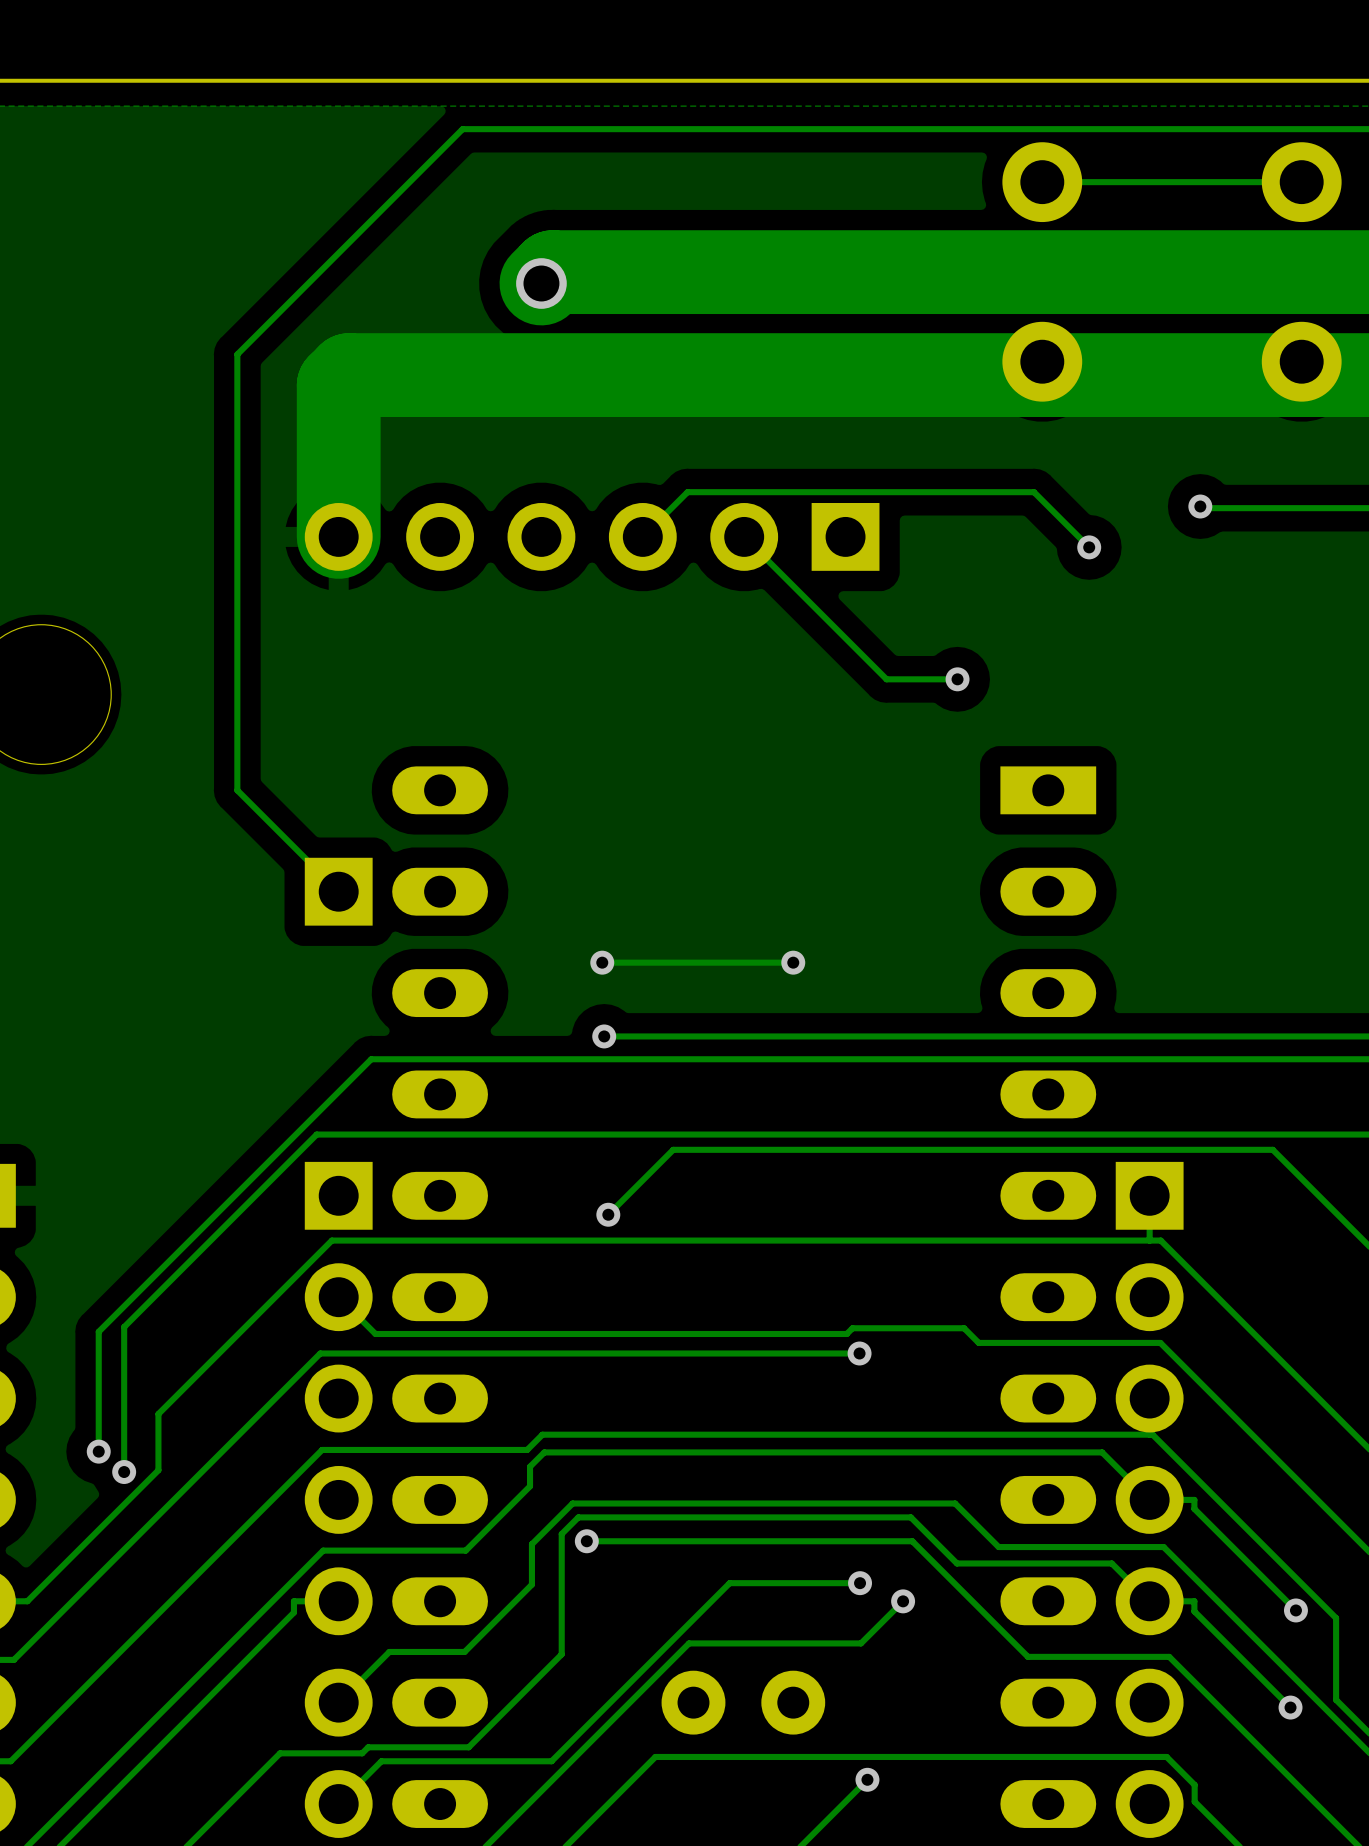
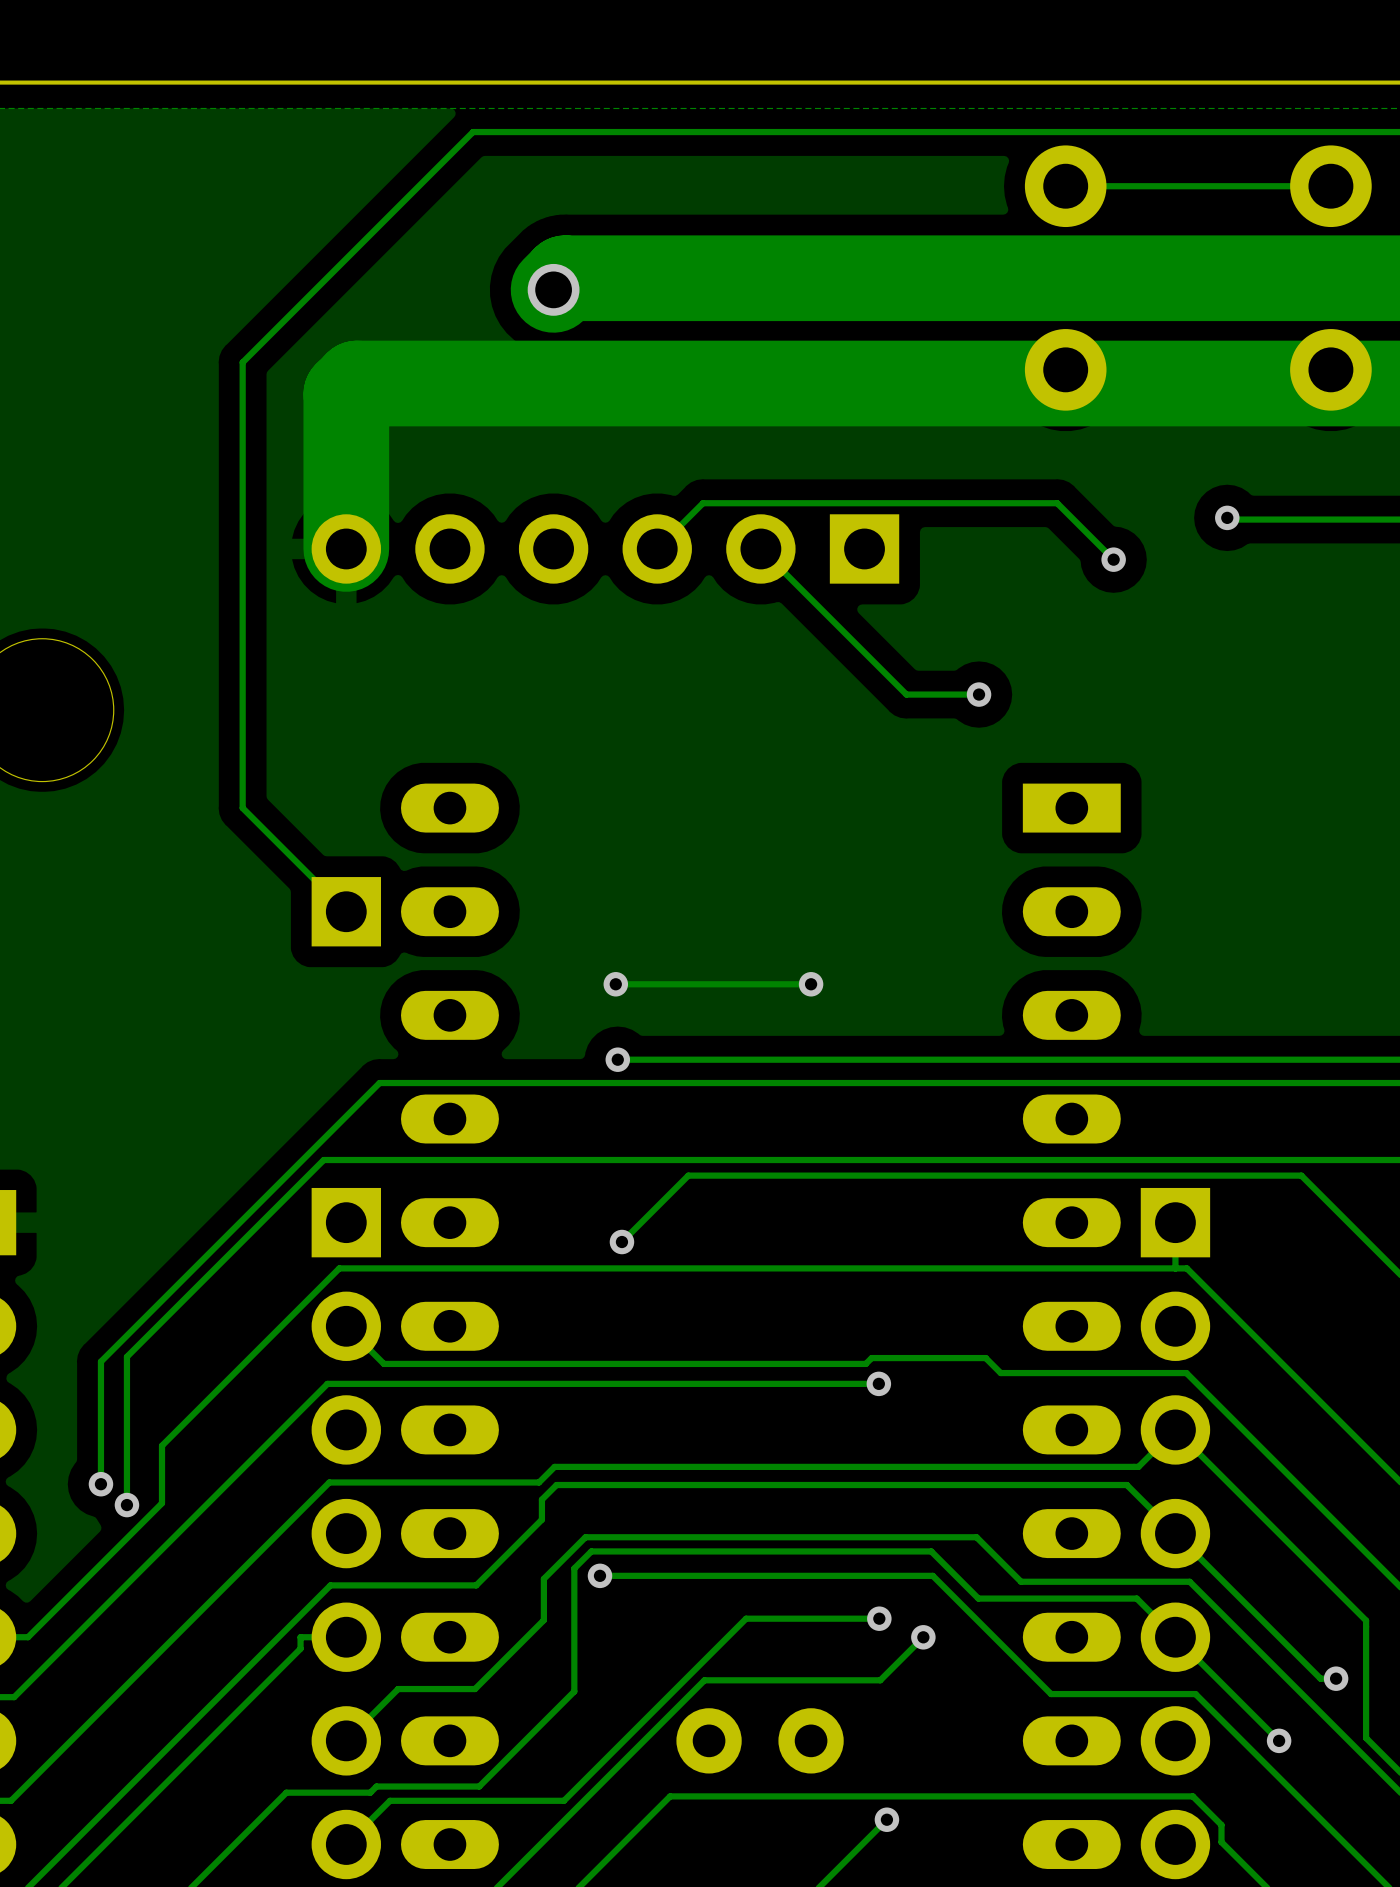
track: (1113, 1434) (1152, 1434) (1336, 1618) -> (1138, 1466) (1175, 1429) (1366, 1620) (1366, 1654)
track: (1149, 1499) (1194, 1499) (1194, 1508) (1295, 1610) -> (1175, 1533) (1320, 1678) (1336, 1678)
track: (1149, 1601) (1194, 1601) (1194, 1611) (1290, 1707) -> (1175, 1637) (1279, 1740)
via position: (1295, 1610) -> (1336, 1678)
via: none -> (1279, 1740)
via: (1290, 1707) -> none

